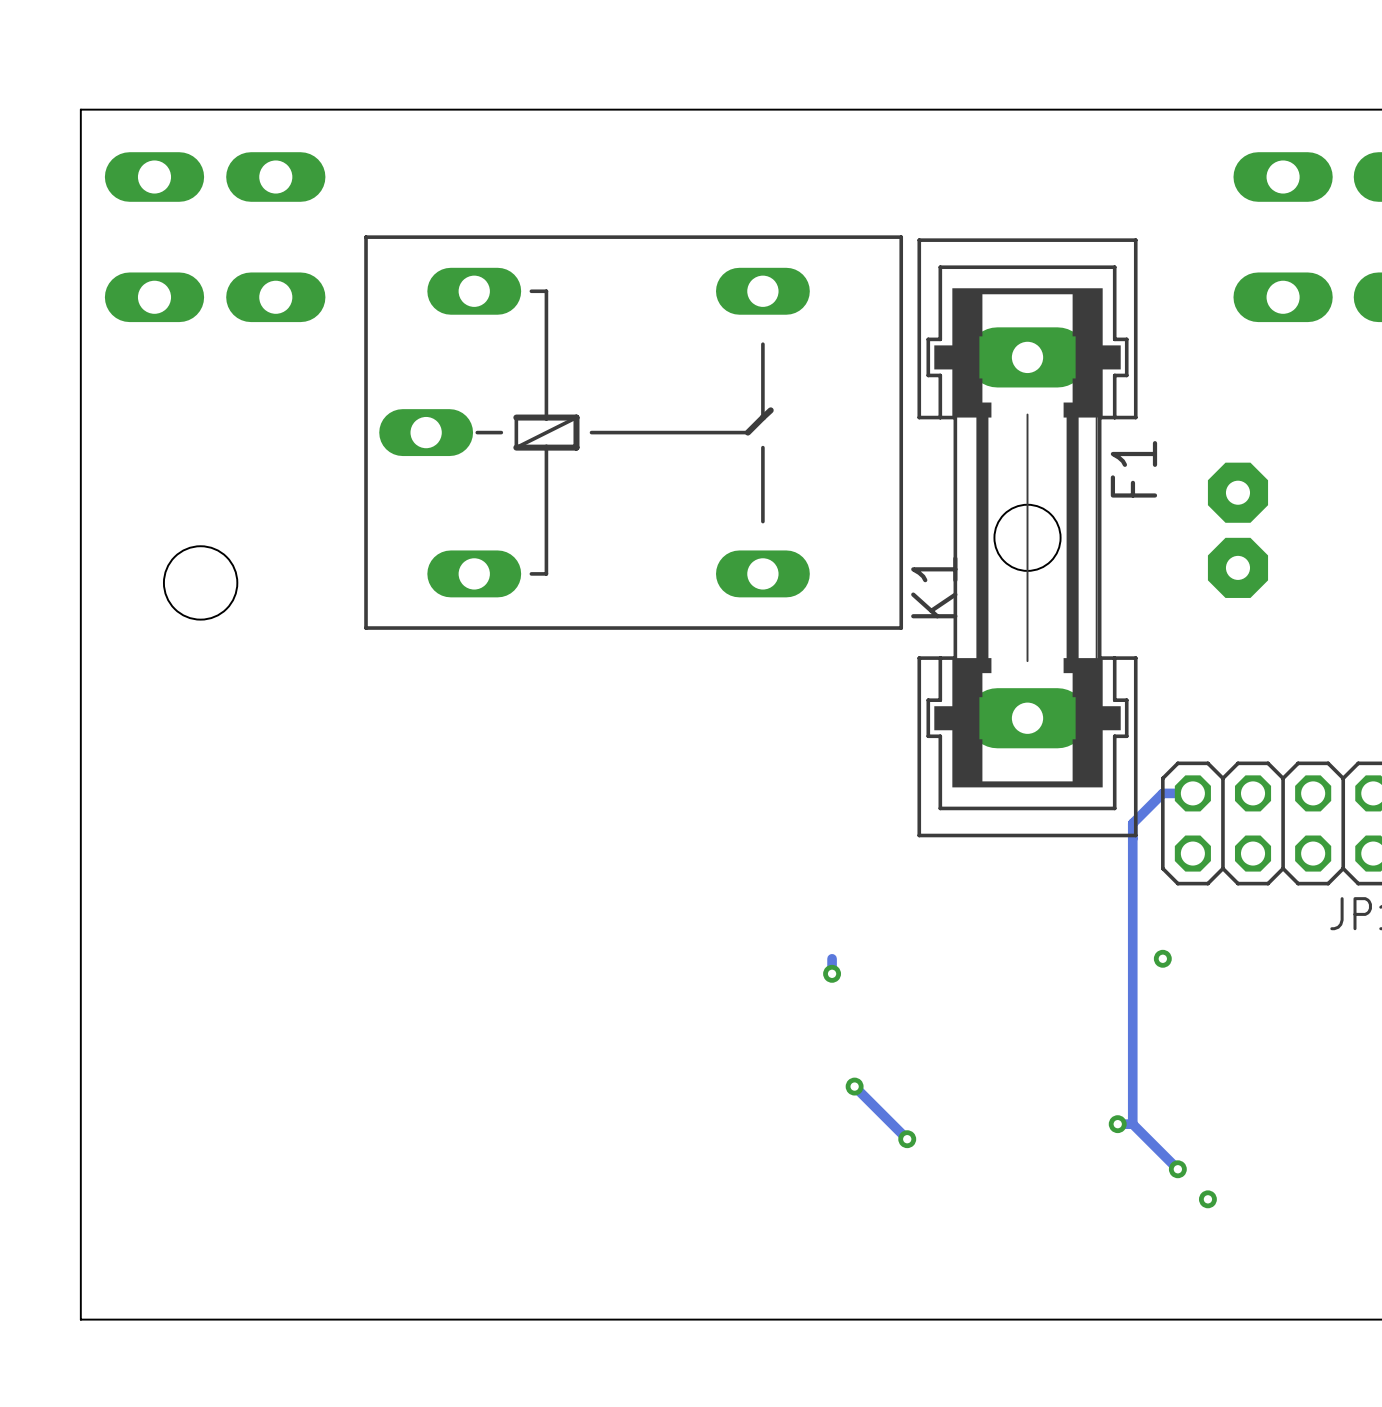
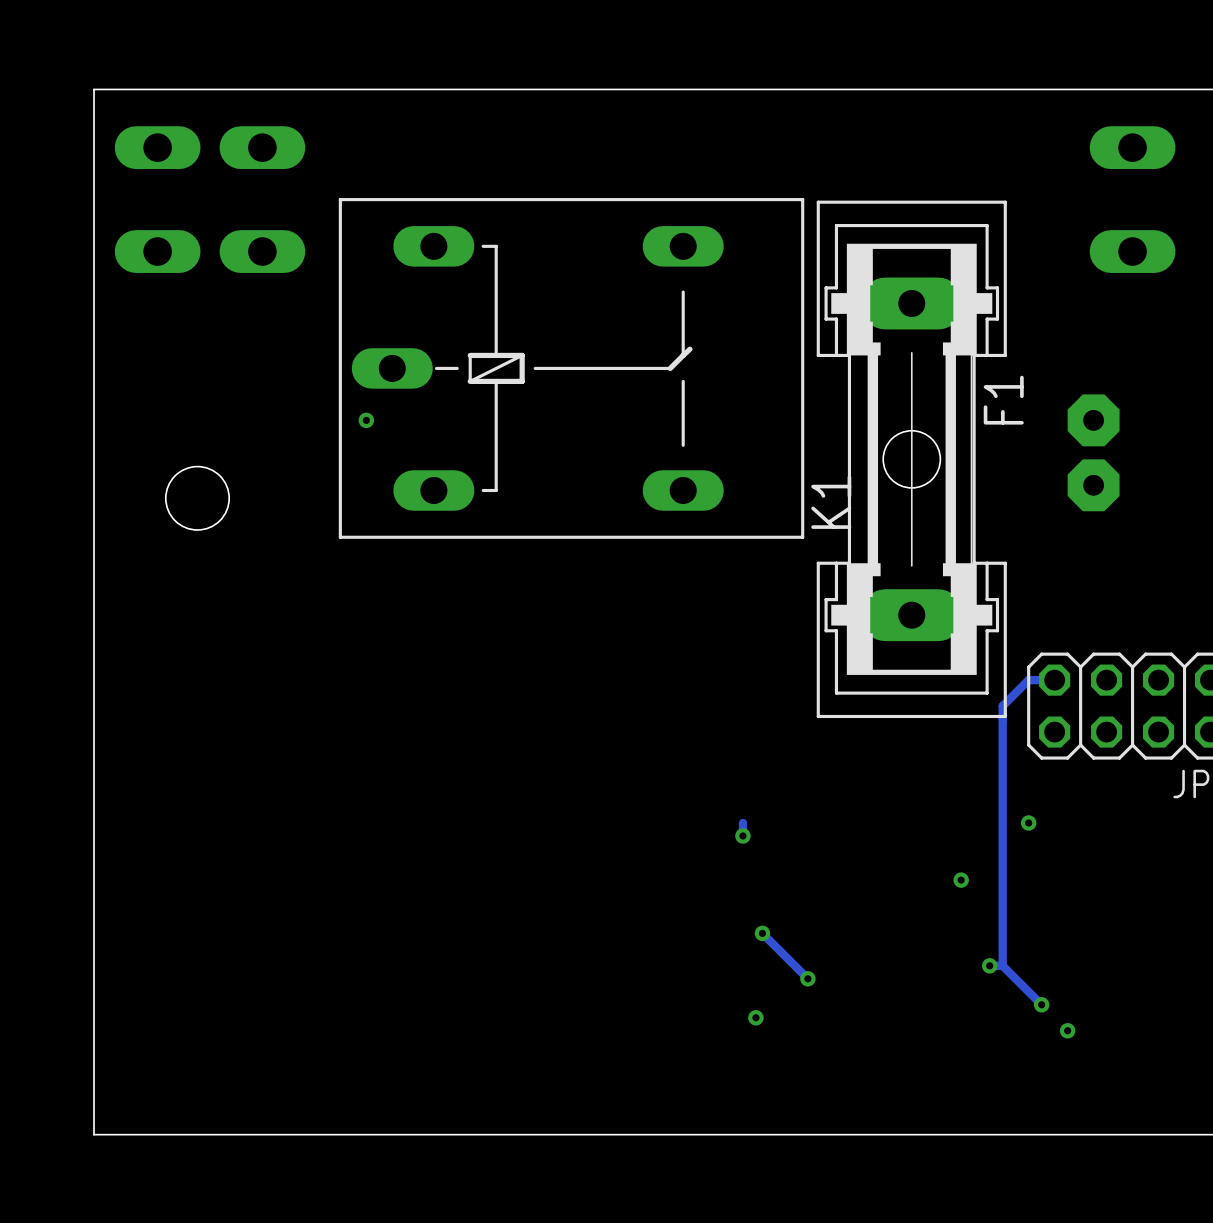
via: none -> (366, 420)
via: none -> (961, 880)
via: none -> (755, 1017)

